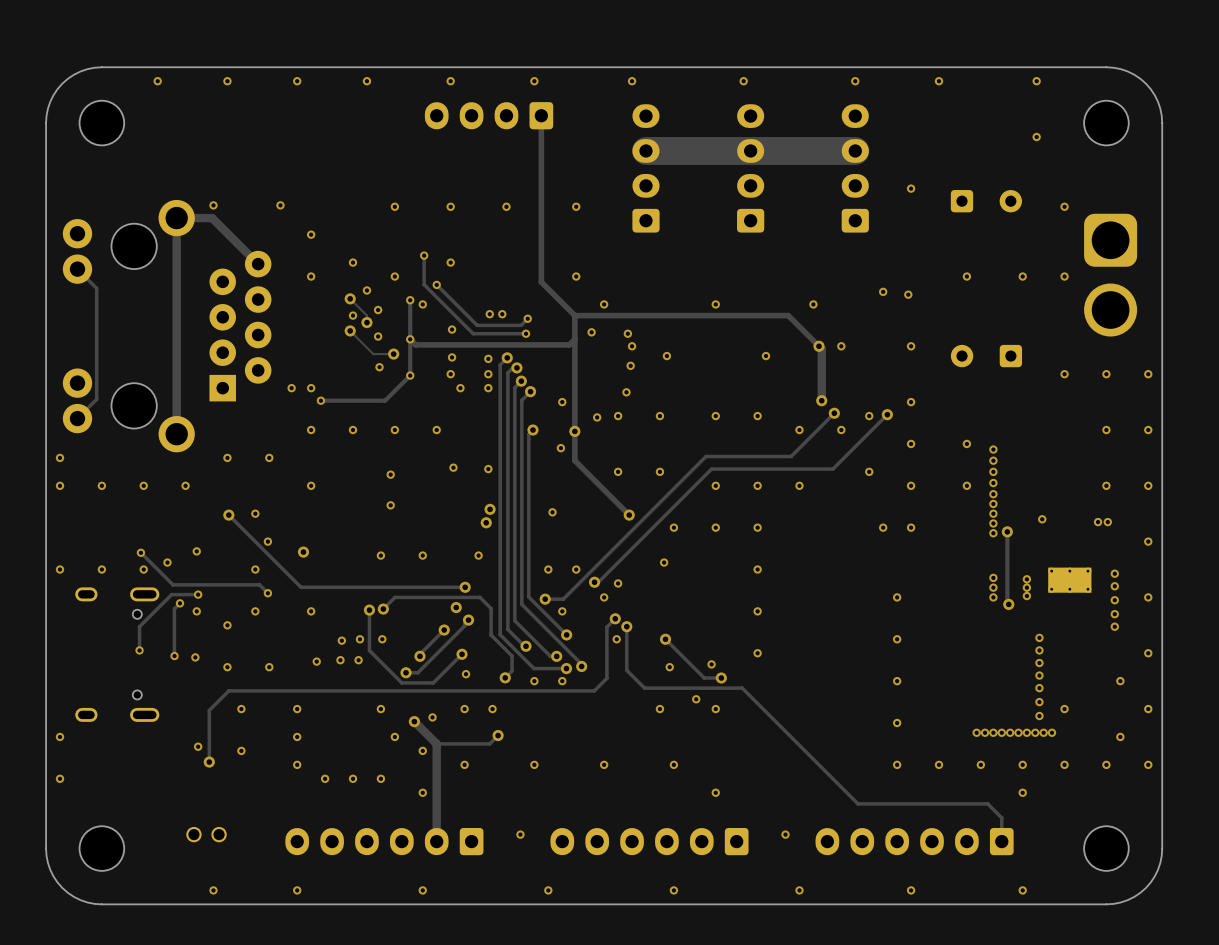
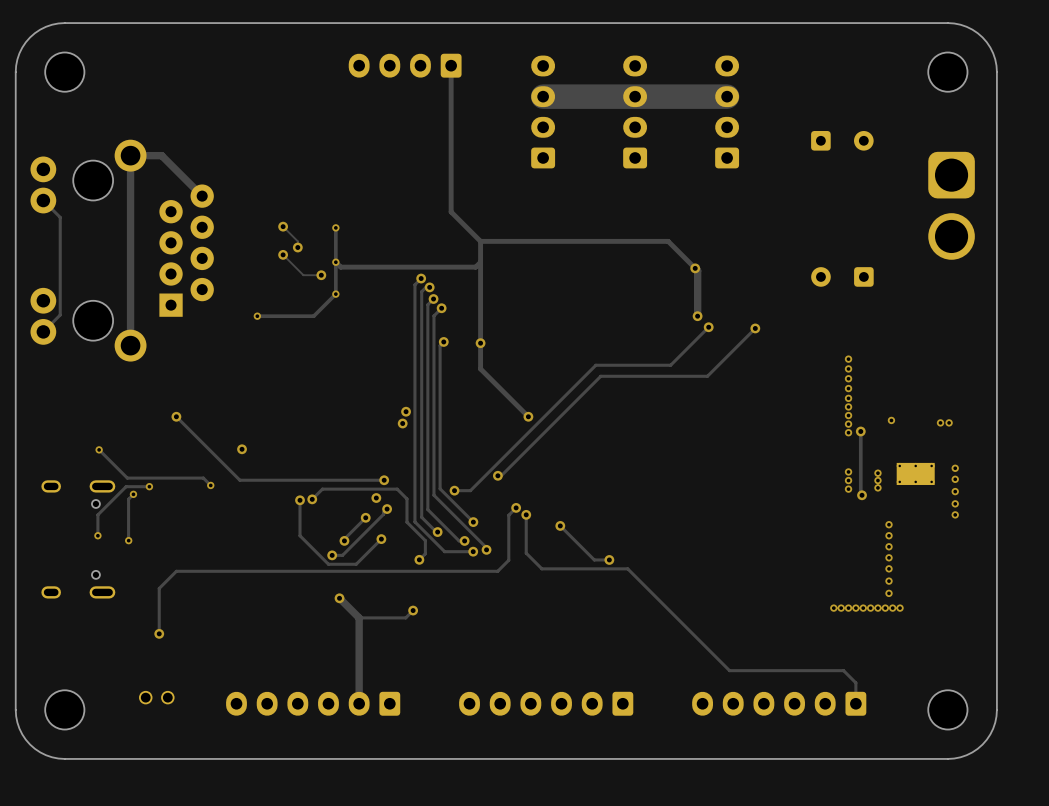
via: (157, 81) -> none
via: (227, 81) -> none
via: (297, 81) -> none
via: (366, 81) -> none
via: (450, 81) -> none
via: (534, 81) -> none
via: (632, 81) -> none
via: (743, 81) -> none
via: (855, 81) -> none
via: (938, 81) -> none
via: (1036, 81) -> none
via: (1036, 137) -> none
via: (911, 188) -> none
via: (213, 205) -> none
via: (280, 205) -> none
via: (394, 206) -> none
via: (450, 206) -> none
via: (506, 206) -> none
via: (576, 206) -> none
via: (1064, 206) -> none
via: (311, 234) -> none
track: (424, 255) (424, 284) (473, 333) (526, 333) -> none
via: (424, 255) -> none
via: (353, 262) -> none
via: (450, 262) -> none
via: (311, 276) -> none
via: (394, 276) -> none
via: (576, 276) -> none
via: (966, 276) -> none
via: (1022, 276) -> none
via: (1064, 276) -> none
track: (436, 284) (477, 325) (521, 325) (527, 318) -> none
via: (436, 284) -> none
via: (366, 290) -> none
via: (883, 291) -> none
via: (908, 294) -> none
via: (422, 304) -> none
via: (604, 304) -> none
via: (715, 304) -> none
via: (813, 304) -> none
via: (378, 310) -> none
via: (489, 314) -> none
via: (502, 314) -> none
via: (353, 315) -> none
via: (527, 318) -> none
via: (452, 329) -> none
via: (591, 332) -> none
via: (526, 333) -> none
via: (627, 333) -> none
via: (378, 336) -> none
via: (632, 346) -> none
via: (841, 346) -> none
via: (911, 346) -> none
via: (666, 356) -> none
via: (765, 356) -> none
via: (452, 357) -> none
via: (488, 358) -> none
via: (630, 365) -> none
via: (379, 367) -> none
via: (450, 374) -> none
via: (488, 374) -> none
via: (1064, 374) -> none
via: (1106, 374) -> none
via: (1148, 374) -> none
via: (291, 388) -> none
via: (311, 388) -> none
via: (460, 388) -> none
via: (488, 388) -> none
via: (626, 392) -> none
via: (562, 402) -> none
via: (911, 402) -> none
via: (618, 416) -> none
via: (659, 416) -> none
via: (715, 416) -> none
via: (757, 416) -> none
via: (869, 416) -> none
via: (597, 417) -> none
via: (311, 430) -> none
via: (353, 430) -> none
via: (394, 430) -> none
via: (436, 430) -> none
via: (799, 430) -> none
via: (841, 430) -> none
via: (1106, 430) -> none
via: (1148, 430) -> none
via: (911, 443) -> none
via: (966, 443) -> none
via: (560, 448) -> none
via: (60, 457) -> none
via: (227, 457) -> none
via: (269, 457) -> none
via: (453, 467) -> none
via: (488, 469) -> none
via: (618, 471) -> none
via: (659, 471) -> none
via: (869, 471) -> none
via: (390, 474) -> none
via: (60, 485) -> none
via: (101, 485) -> none
via: (143, 485) -> none
via: (185, 485) -> none
via: (311, 485) -> none
via: (715, 485) -> none
via: (757, 485) -> none
via: (799, 485) -> none
via: (911, 485) -> none
via: (966, 485) -> none
via: (1106, 485) -> none
via: (1148, 485) -> none
via: (390, 505) -> none
via: (552, 512) -> none
via: (255, 513) -> none
via: (673, 527) -> none
via: (715, 527) -> none
via: (757, 527) -> none
via: (883, 527) -> none
via: (911, 527) -> none
via: (267, 541) -> none
via: (1148, 541) -> none
via: (196, 551) -> none
via: (380, 555) -> none
via: (422, 555) -> none
via: (478, 555) -> none
via: (167, 562) -> none
via: (664, 562) -> none
via: (60, 569) -> none
via: (101, 569) -> none
via: (143, 569) -> none
via: (255, 569) -> none
via: (548, 569) -> none
via: (576, 569) -> none
via: (757, 569) -> none
via: (618, 583) -> none
via: (604, 597) -> none
via: (897, 597) -> none
via: (1148, 597) -> none
via: (196, 611) -> none
via: (255, 611) -> none
via: (311, 611) -> none
via: (562, 611) -> none
via: (757, 611) -> none
via: (227, 625) -> none
via: (359, 639) -> none
via: (382, 639) -> none
via: (616, 639) -> none
via: (897, 639) -> none
via: (341, 640) -> none
via: (757, 653) -> none
via: (1148, 653) -> none
via: (195, 657) -> none
via: (340, 660) -> none
via: (358, 660) -> none
via: (316, 661) -> none
via: (711, 664) -> none
via: (227, 667) -> none
via: (269, 667) -> none
via: (669, 667) -> none
via: (466, 674) -> none
via: (534, 681) -> none
via: (562, 681) -> none
via: (897, 681) -> none
via: (1120, 681) -> none
via: (696, 699) -> none
via: (241, 709) -> none
via: (297, 709) -> none
via: (380, 709) -> none
via: (464, 709) -> none
via: (492, 709) -> none
via: (659, 709) -> none
via: (715, 709) -> none
via: (1064, 709) -> none
via: (1148, 709) -> none
via: (432, 717) -> none
via: (897, 722) -> none
via: (60, 736) -> none
via: (297, 736) -> none
via: (394, 736) -> none
via: (1120, 736) -> none
via: (198, 746) -> none
via: (241, 750) -> none
via: (422, 750) -> none
via: (297, 764) -> none
via: (464, 764) -> none
via: (534, 764) -> none
via: (604, 764) -> none
via: (673, 764) -> none
via: (897, 764) -> none
via: (938, 764) -> none
via: (980, 764) -> none
via: (1022, 764) -> none
via: (1064, 764) -> none
via: (1106, 764) -> none
via: (1148, 764) -> none
via: (60, 778) -> none
via: (325, 778) -> none
via: (353, 778) -> none
via: (380, 778) -> none
via: (422, 792) -> none
via: (715, 792) -> none
via: (1022, 792) -> none
via: (520, 834) -> none
via: (785, 834) -> none
via: (213, 890) -> none
via: (297, 890) -> none
via: (422, 890) -> none
via: (548, 890) -> none
via: (673, 890) -> none
via: (799, 890) -> none
via: (911, 890) -> none
via: (1022, 890) -> none

